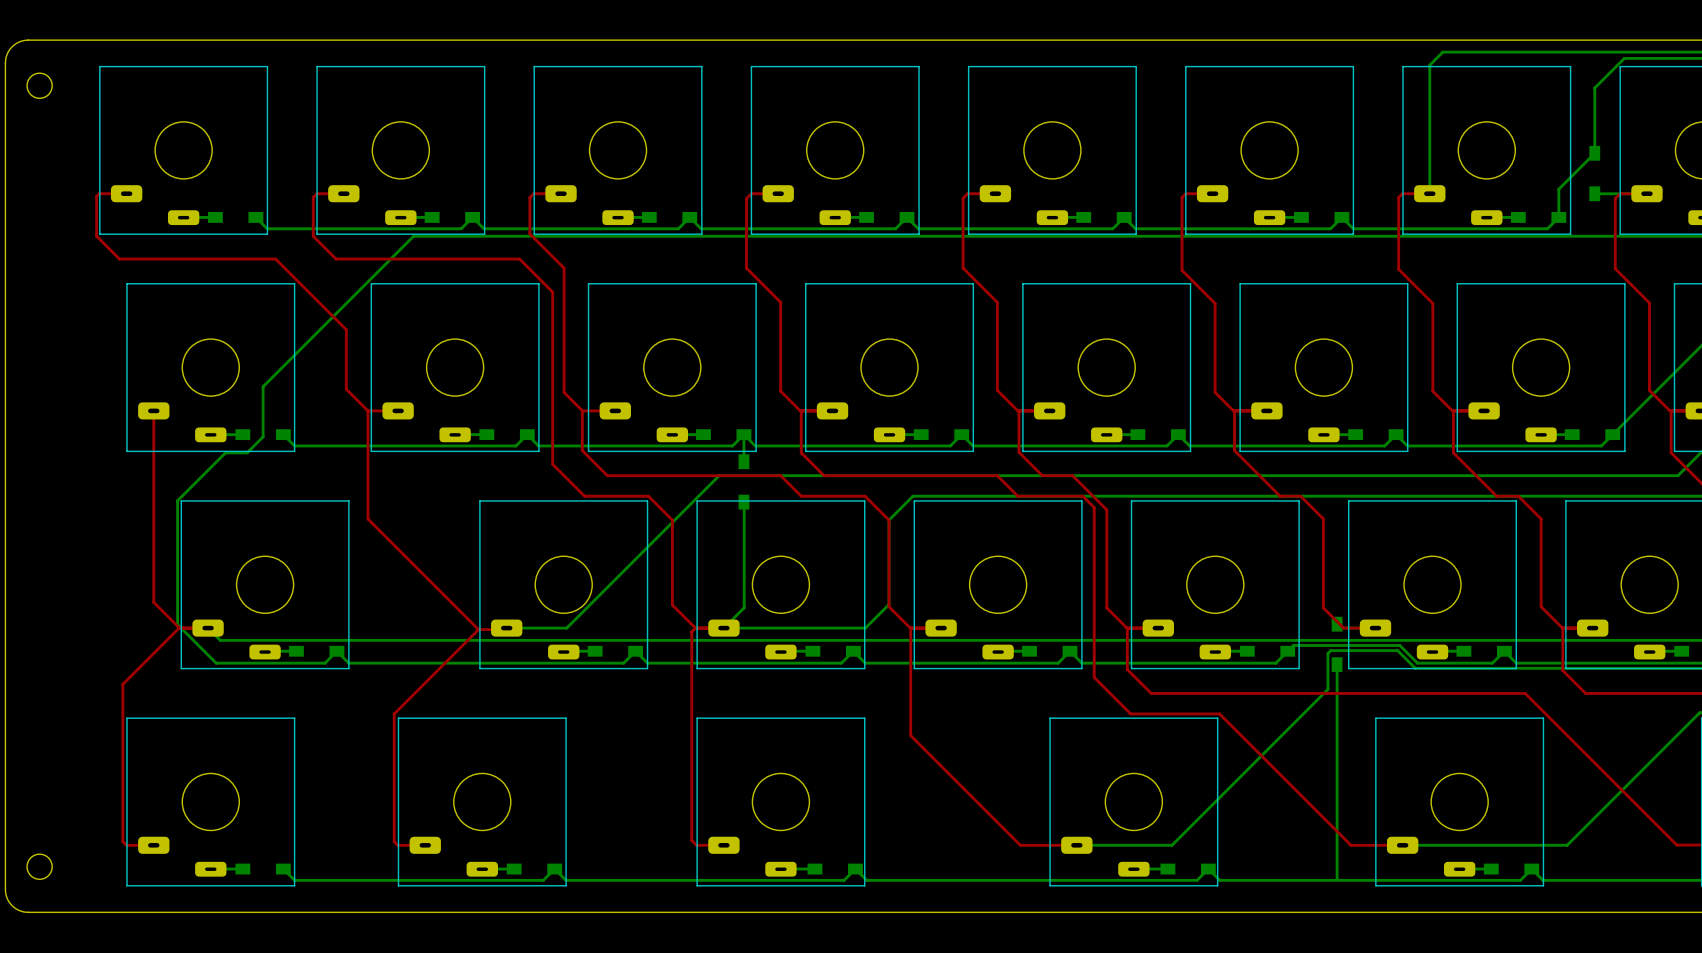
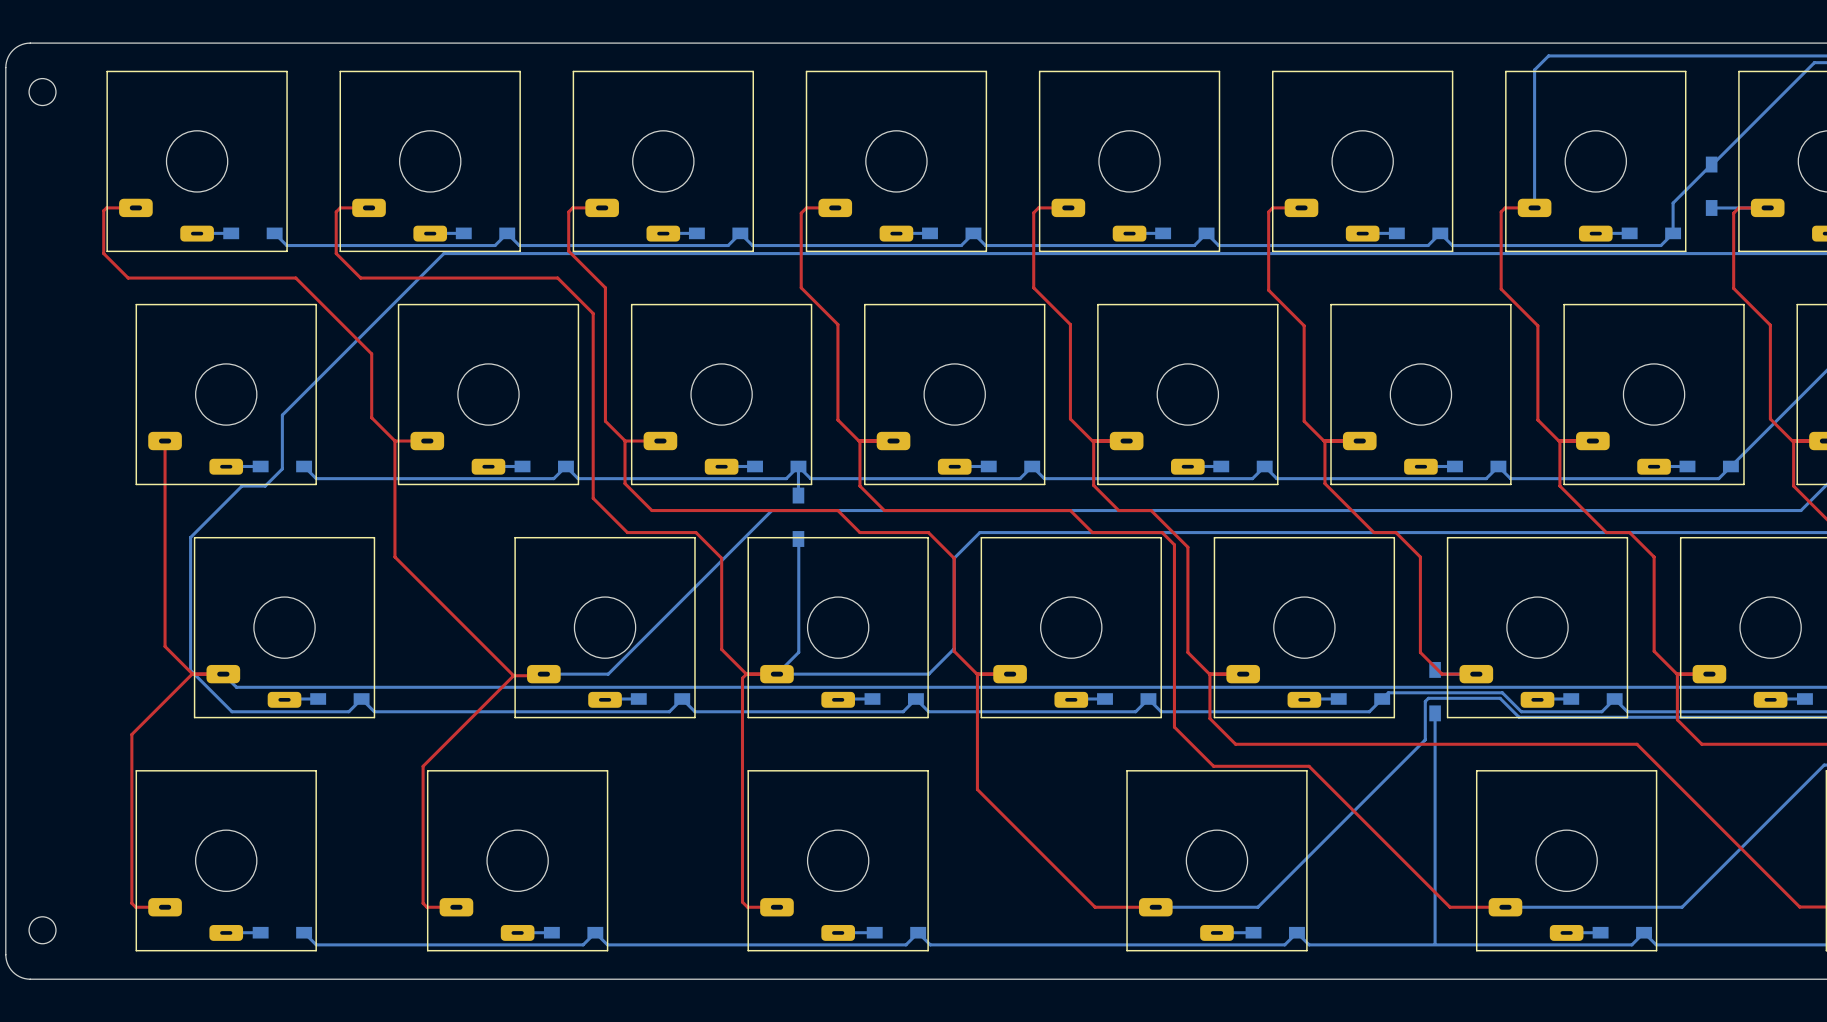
bottom track: (1690, 58) (1624, 58) (1594, 88) (1594, 153) -> (1814, 62) (1711, 164)

